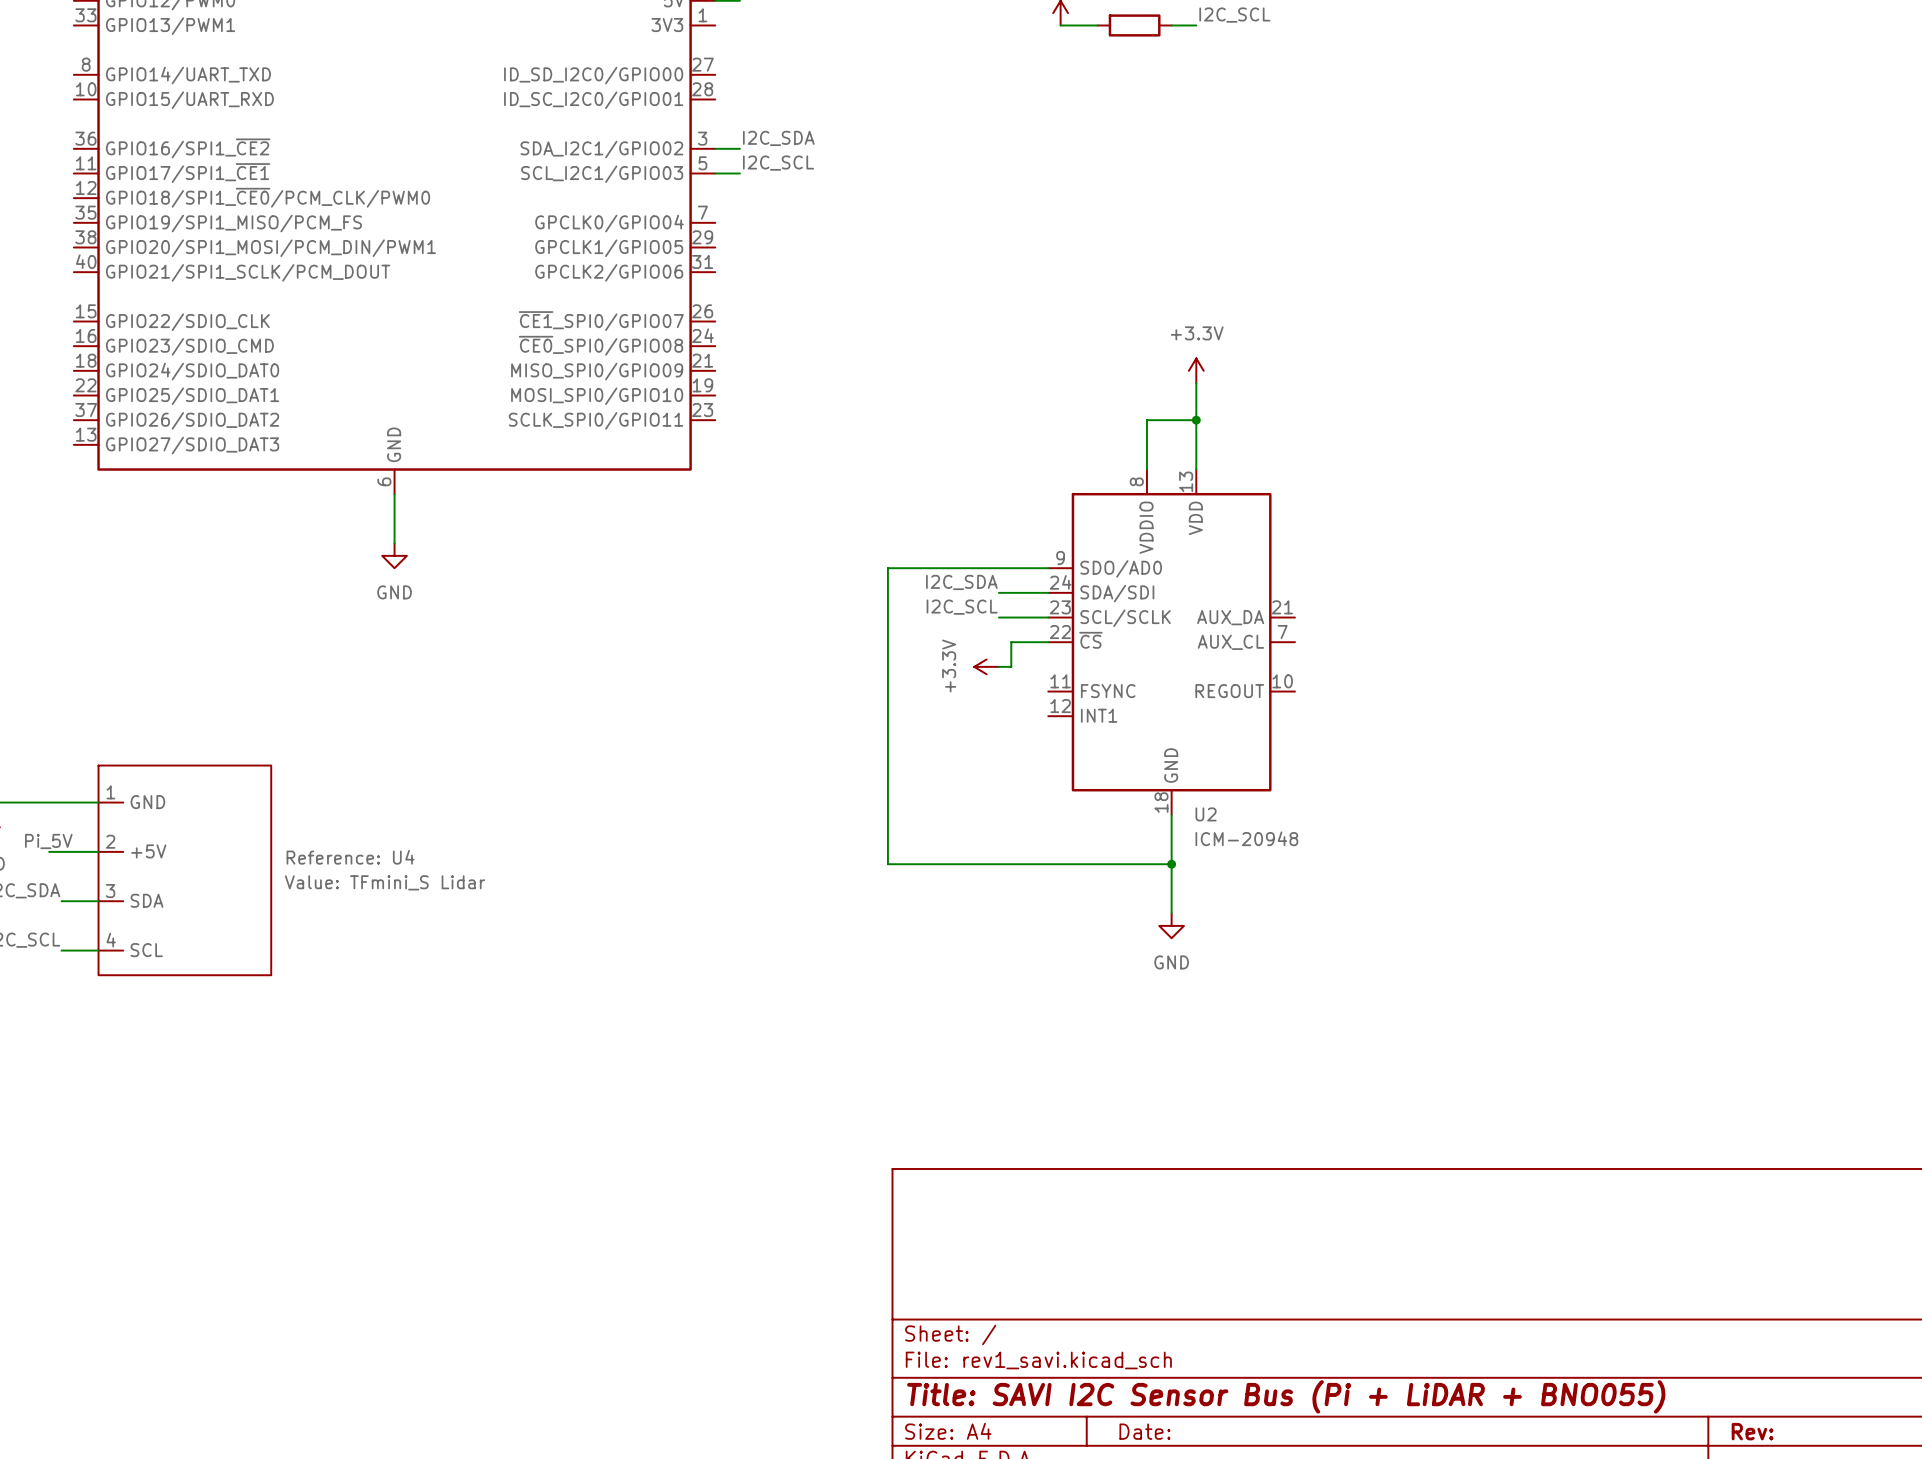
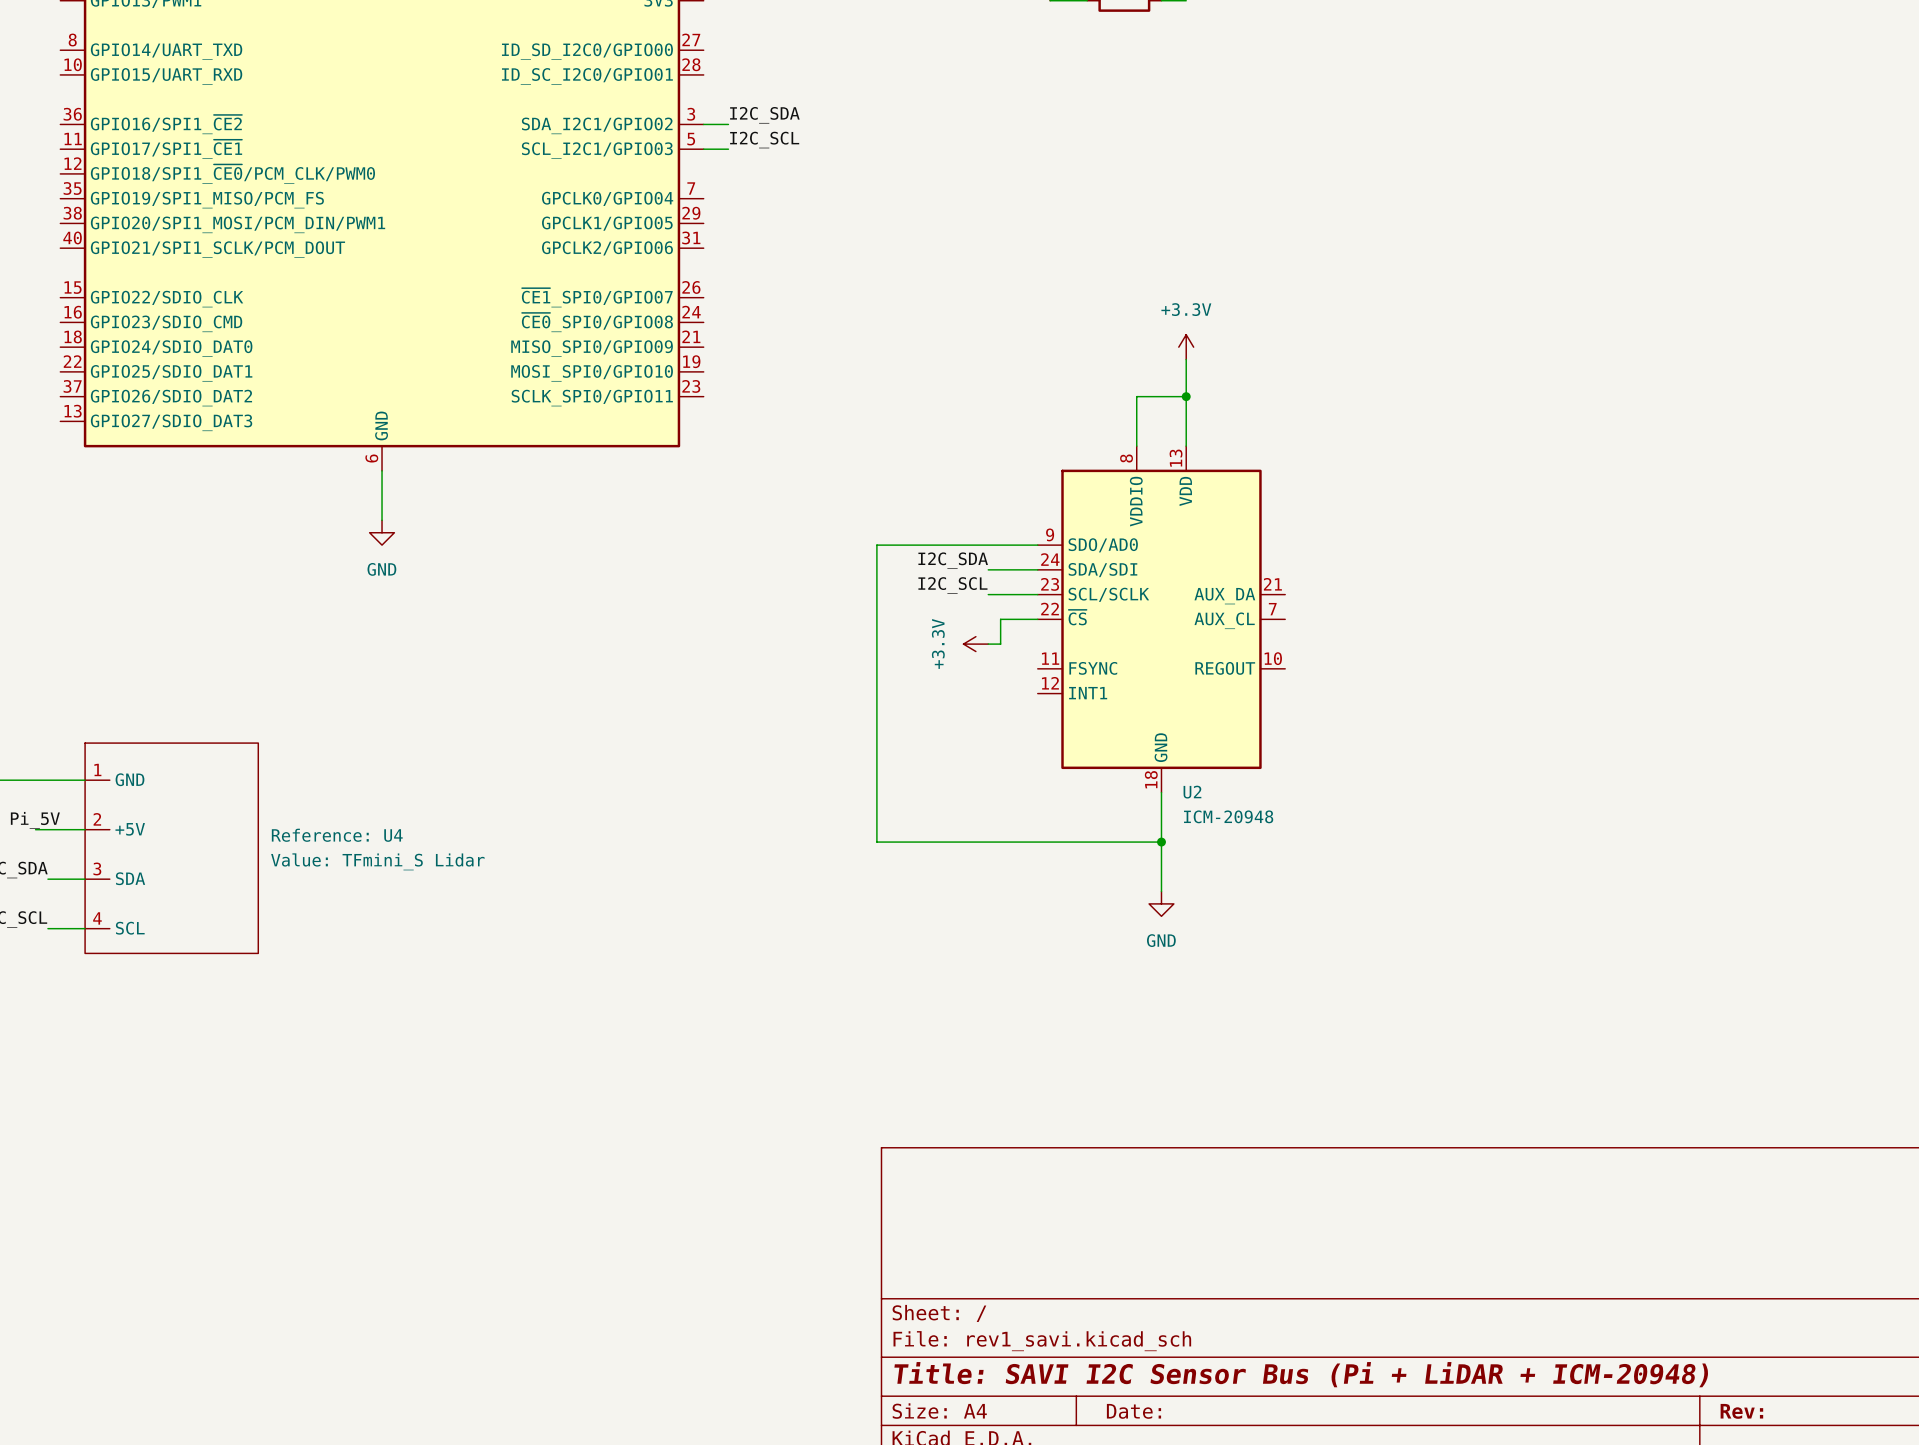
title block: Title: SAVI I2C Sensor Bus (Pi + LiDAR + BNO055) (1286, 1396) -> Title: SAVI I2C Sensor Bus (Pi + LiDAR + ICM-20948) (1301, 1374)

